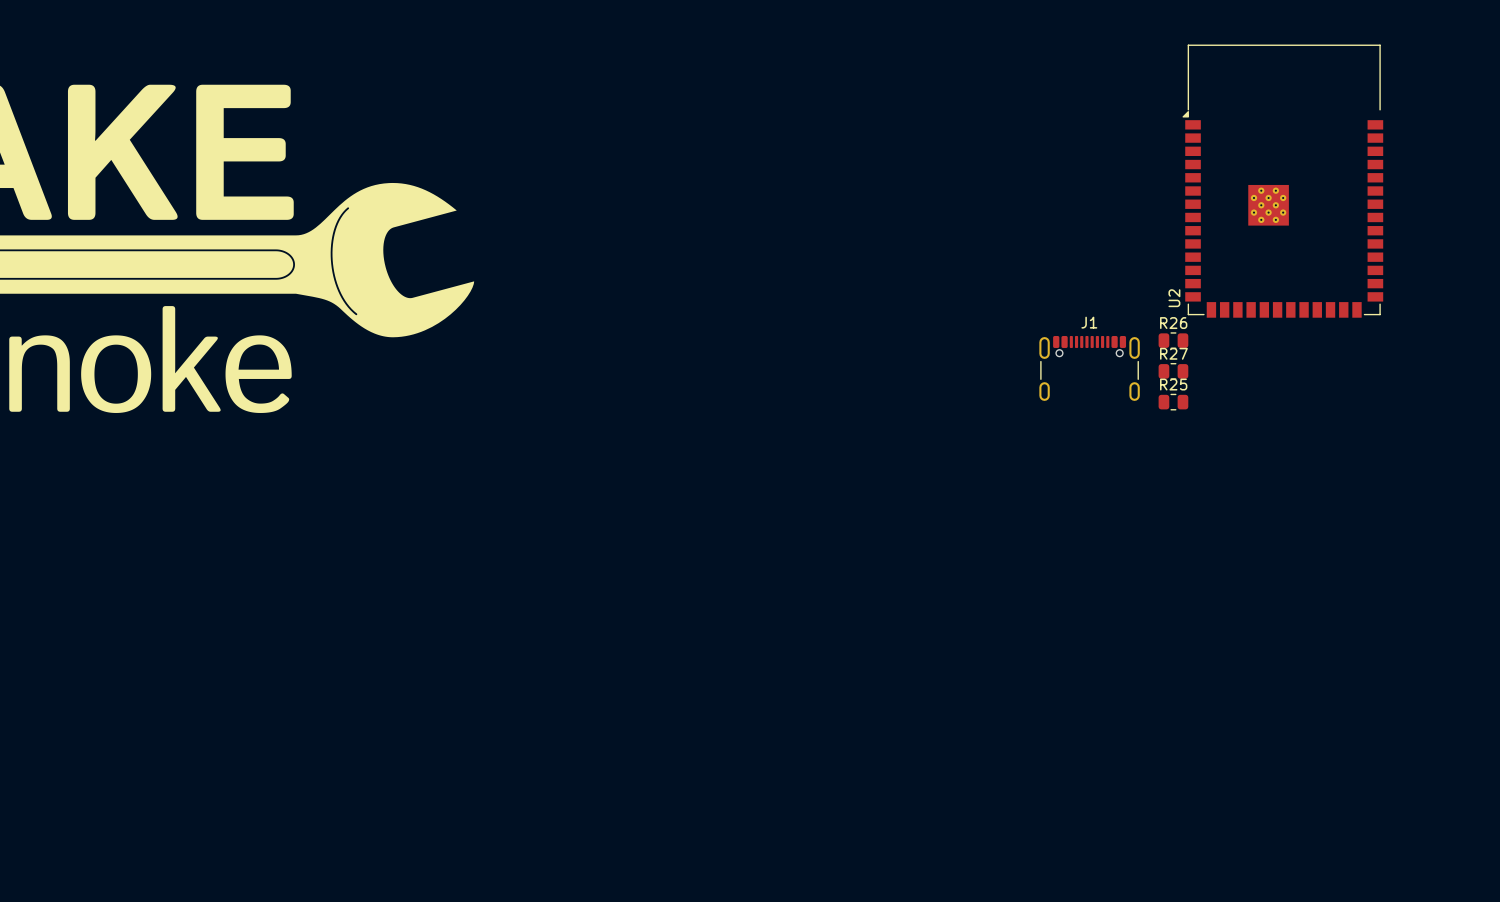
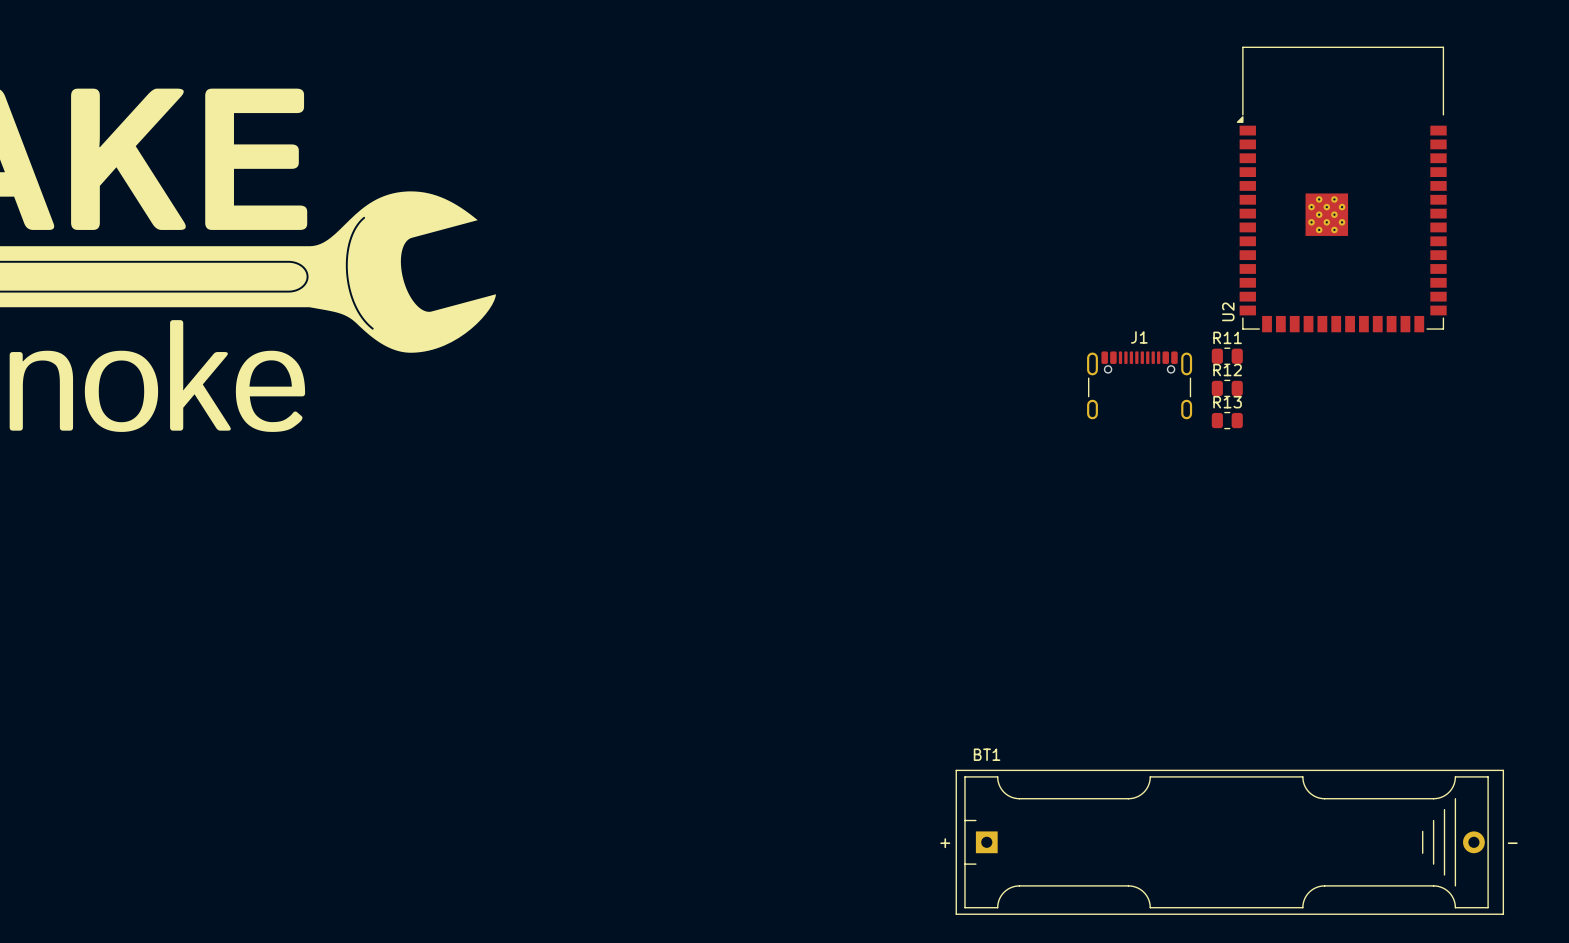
R26 name: R26 (1173, 323) -> R11 (1227, 337)
R27 name: R27 (1173, 353) -> R12 (1227, 370)
R25 name: R25 (1173, 384) -> R13 (1227, 402)
BT1: none -> (1229, 842)

